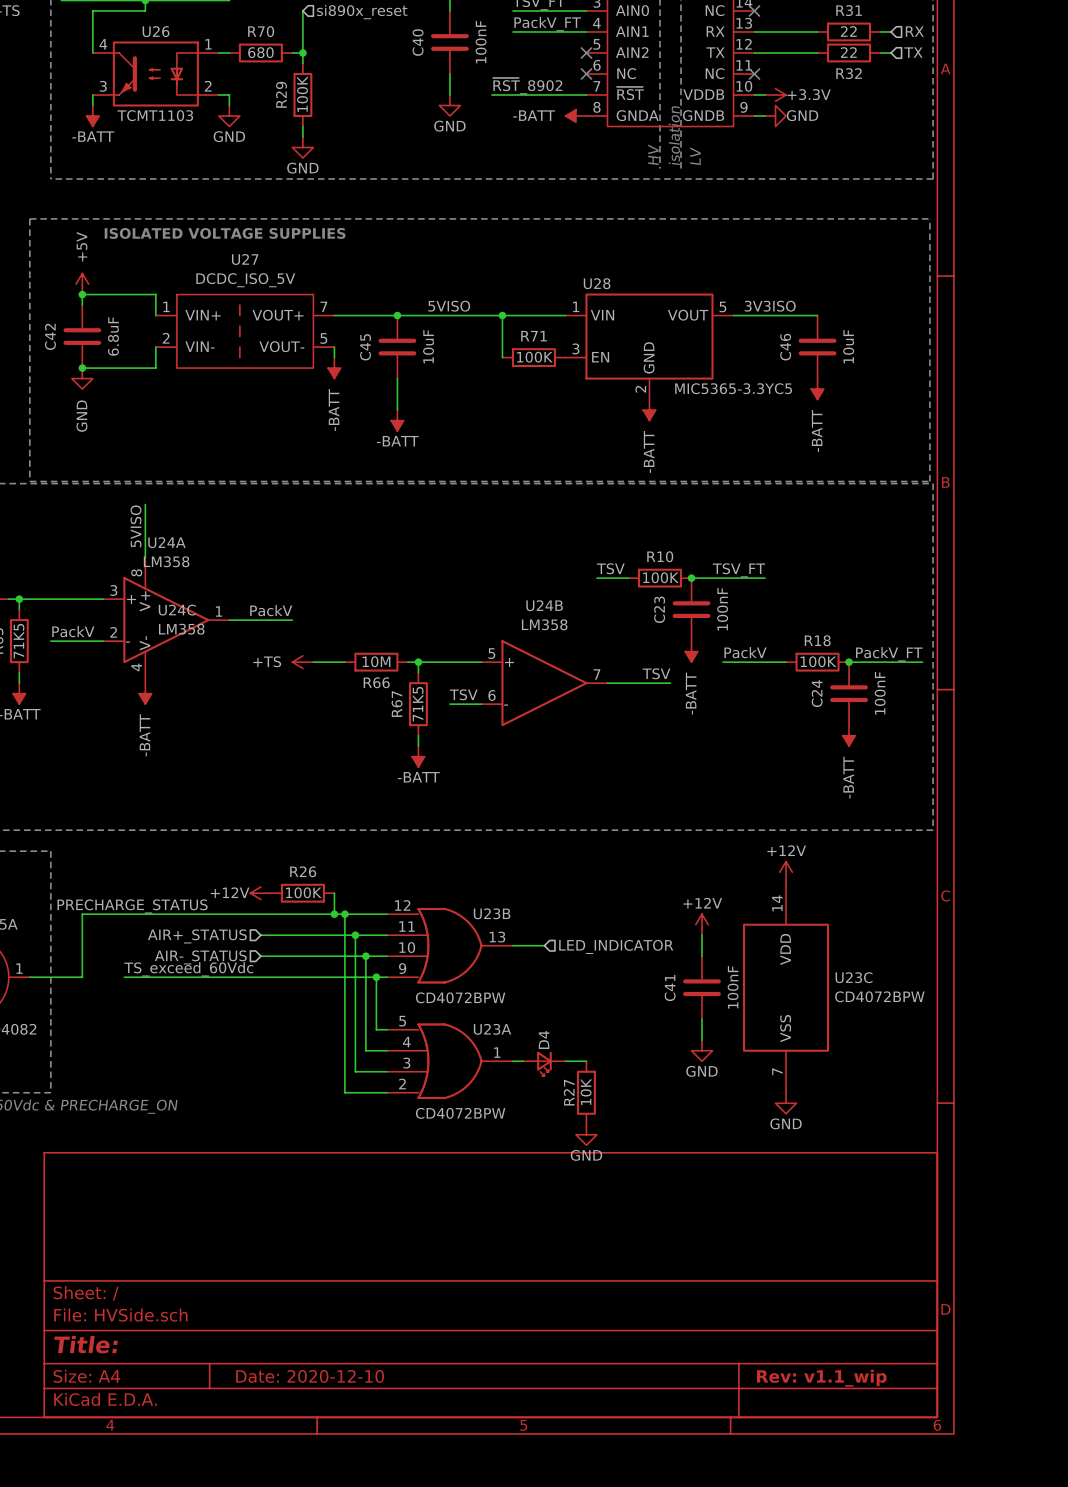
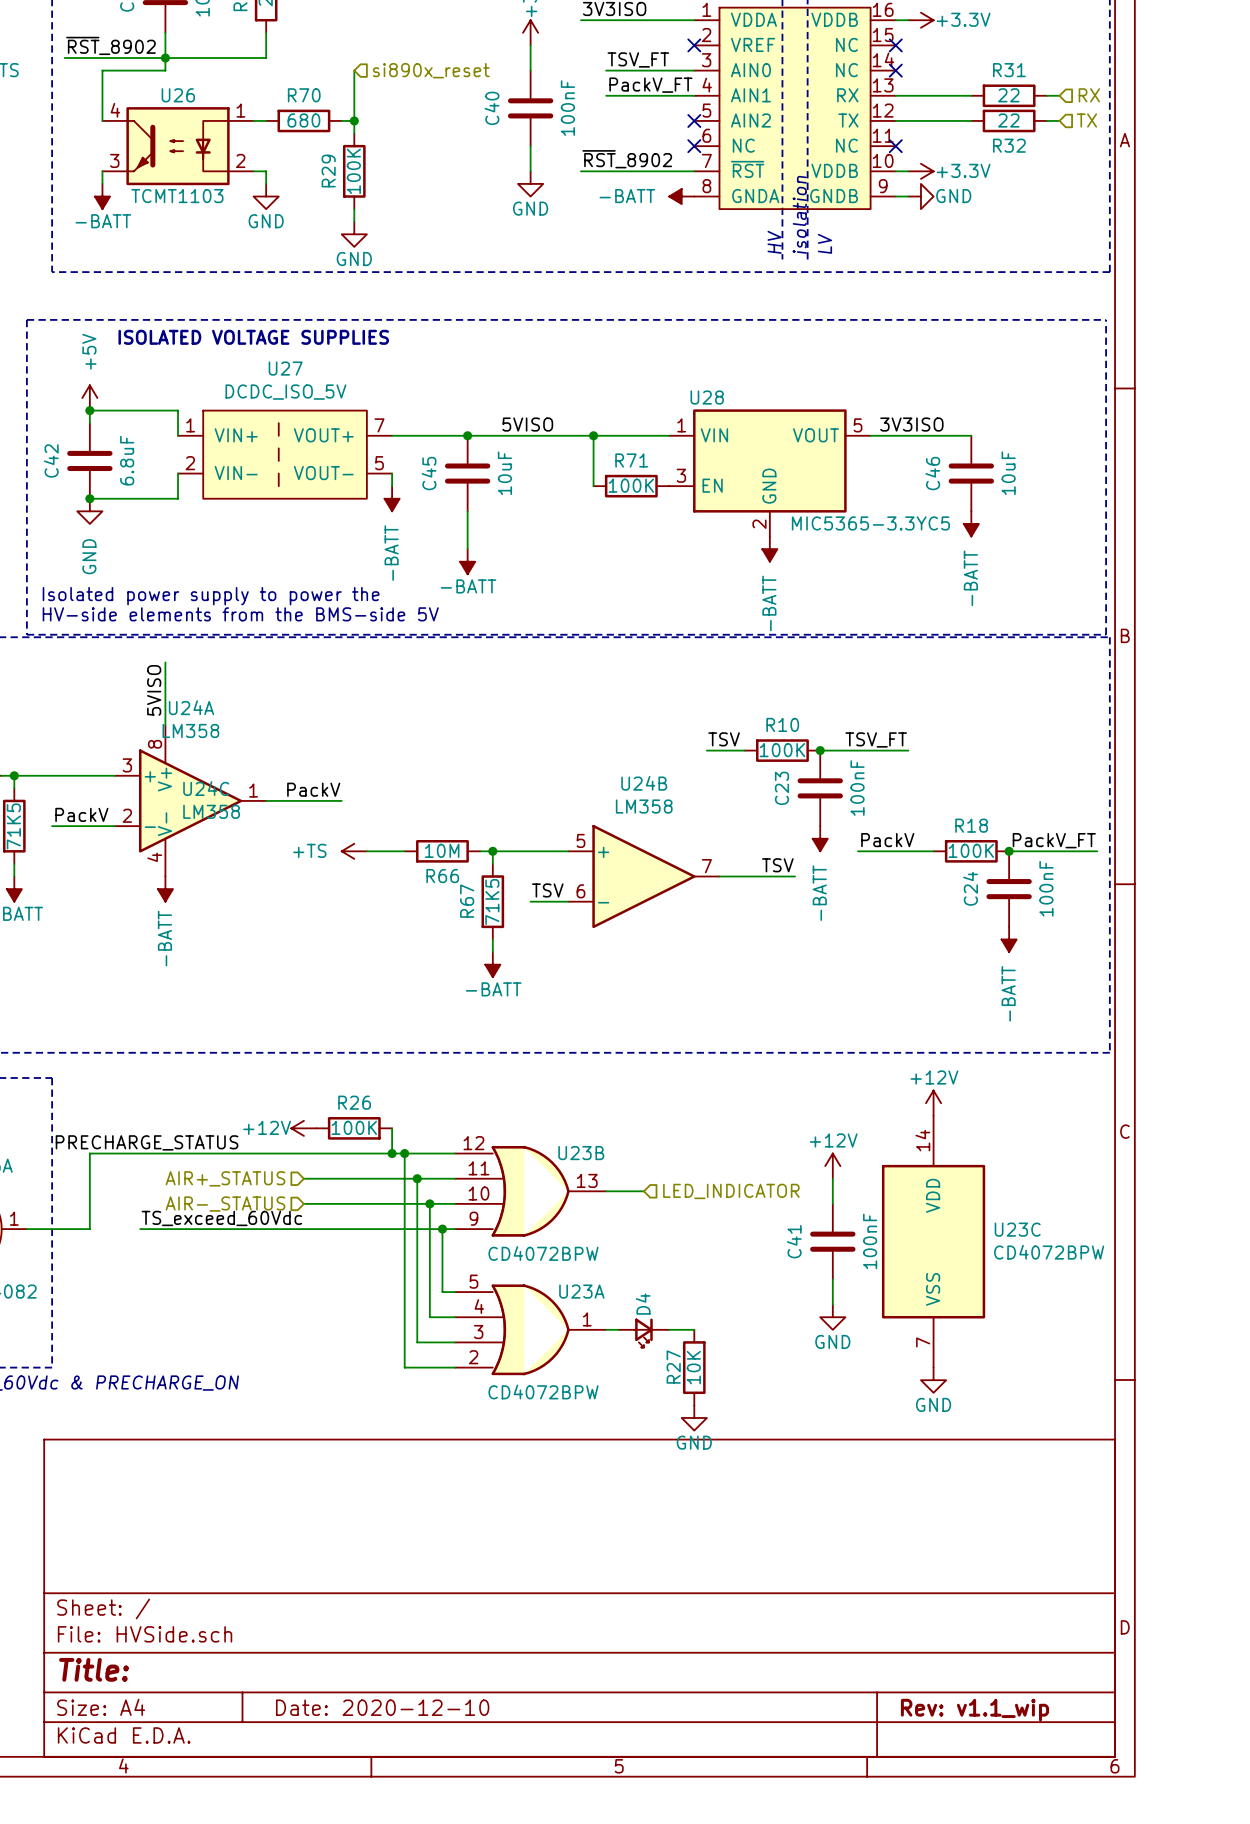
text: none -> Isolated power supply to power the (211, 596)
text: none -> HV-side elements from the BMS-side 5V (240, 614)

